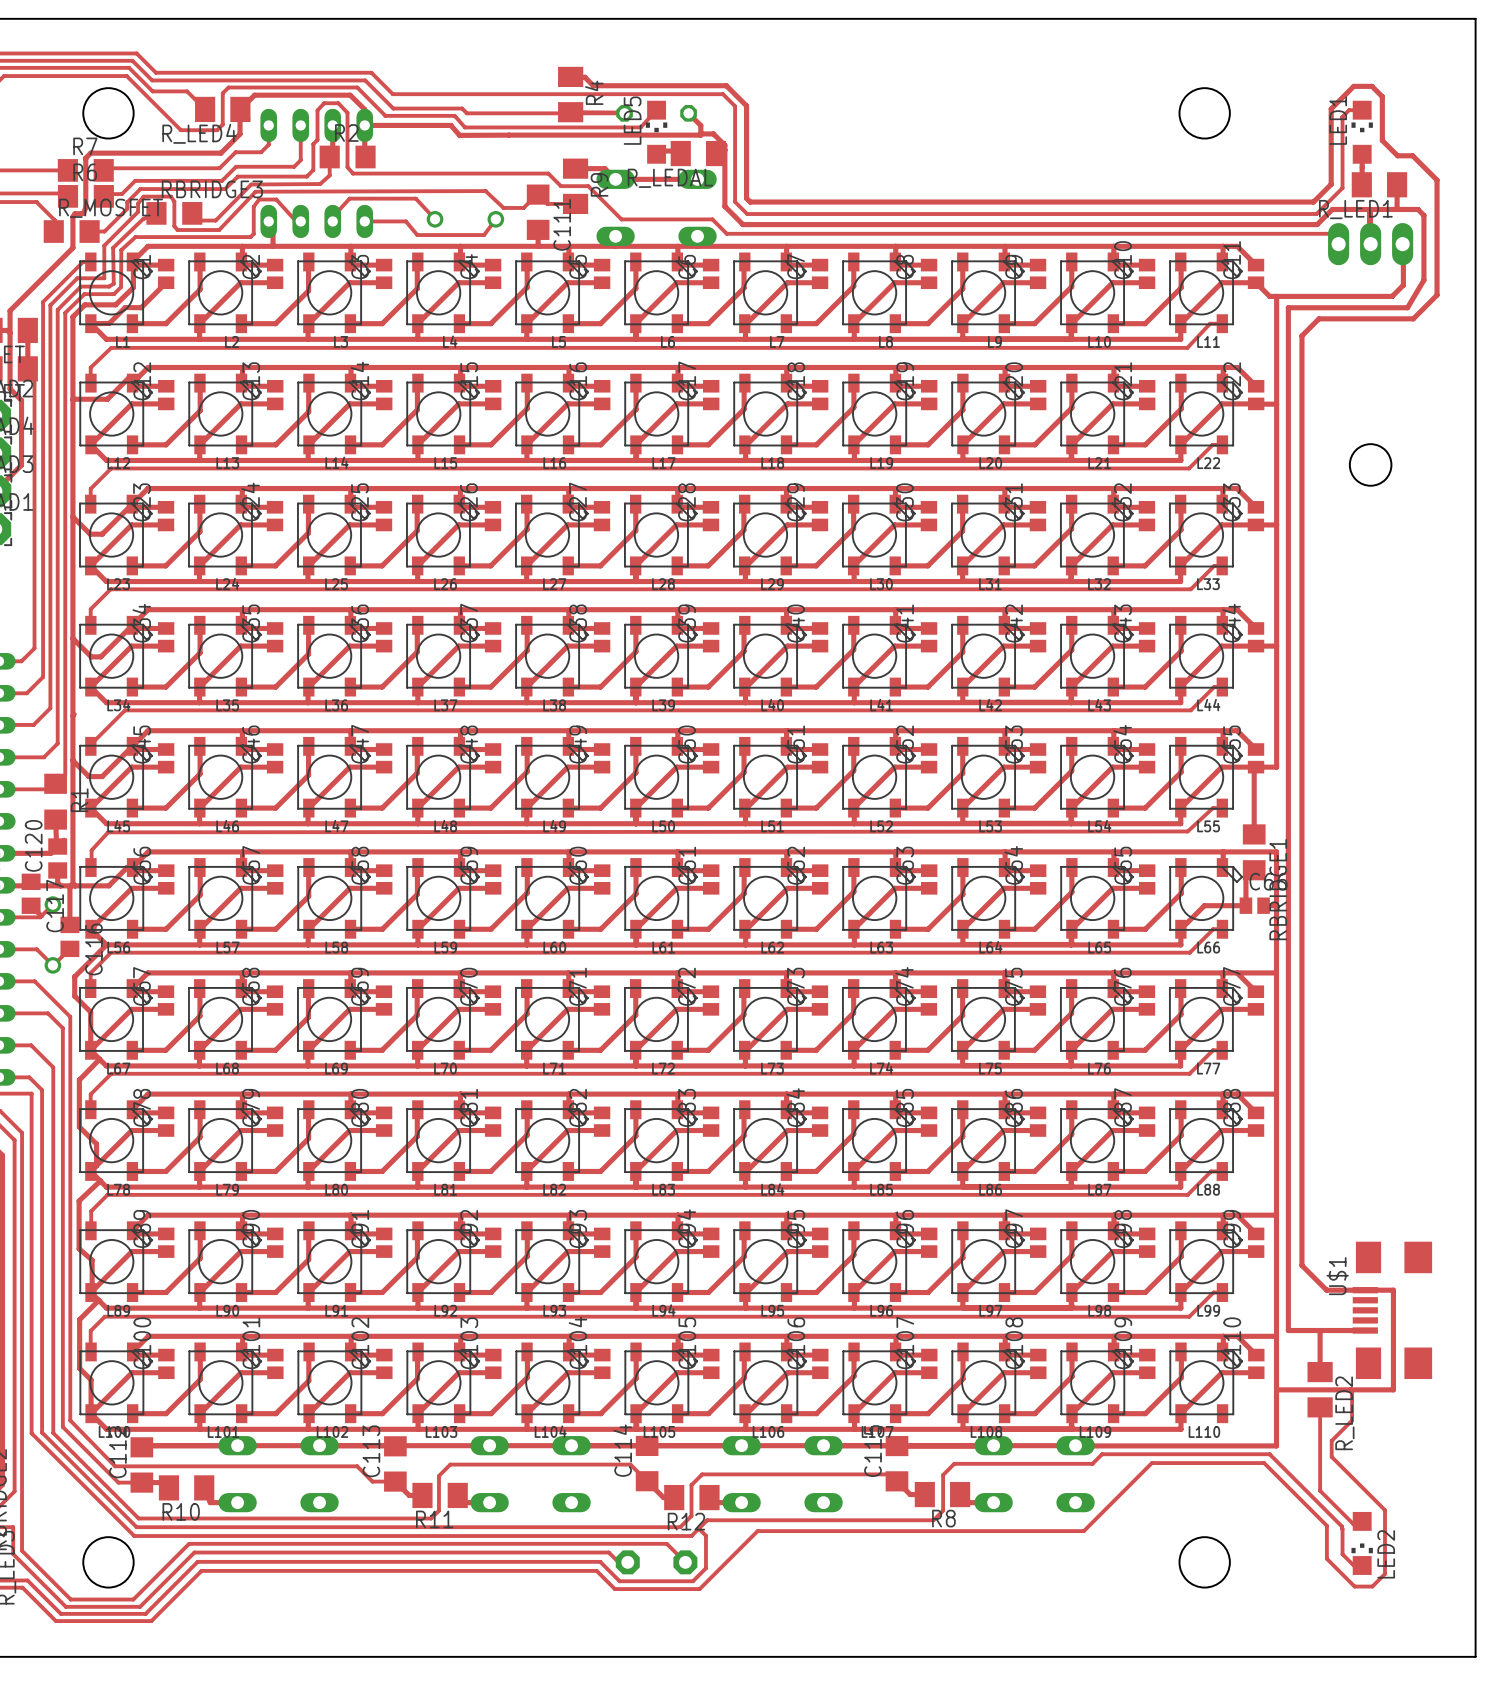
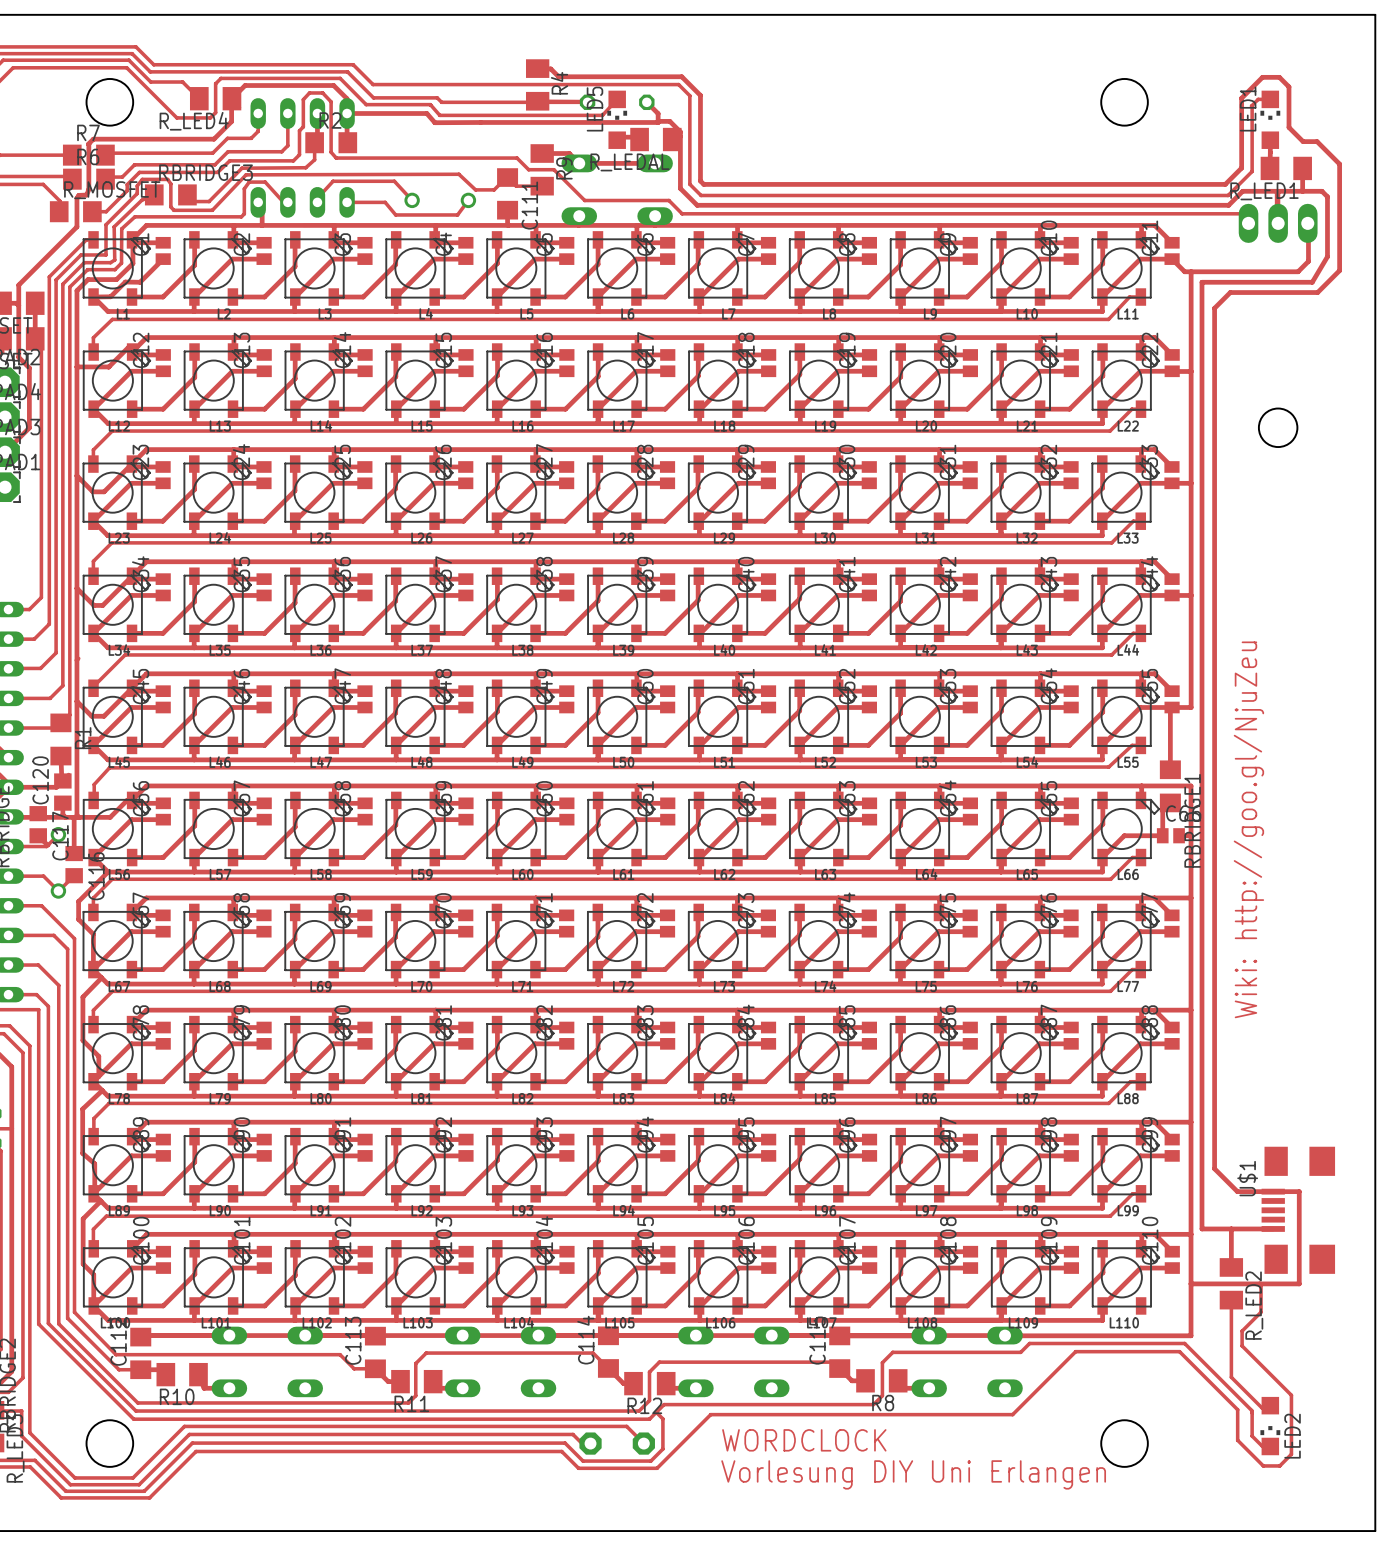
text: none -> Wiki: http://goo.gl/NjuZeu (1248, 829)
text: none -> WORDCLOCK (804, 1440)
text: none -> Vorlesung DIY Uni Erlangen (913, 1474)

